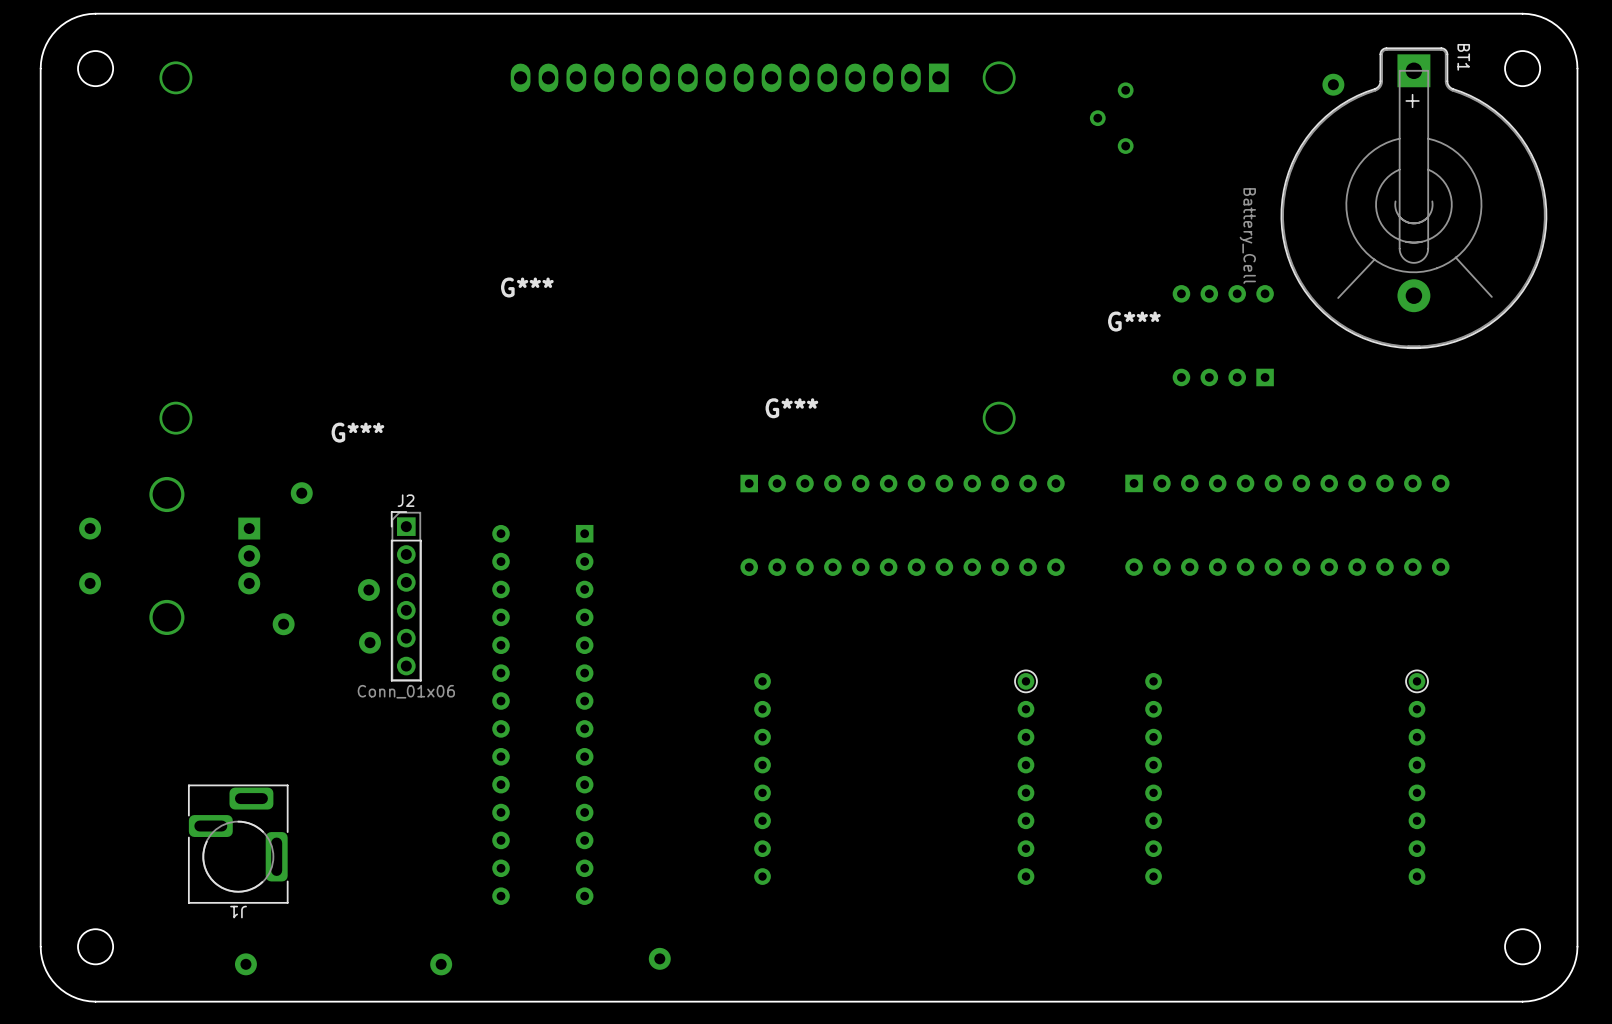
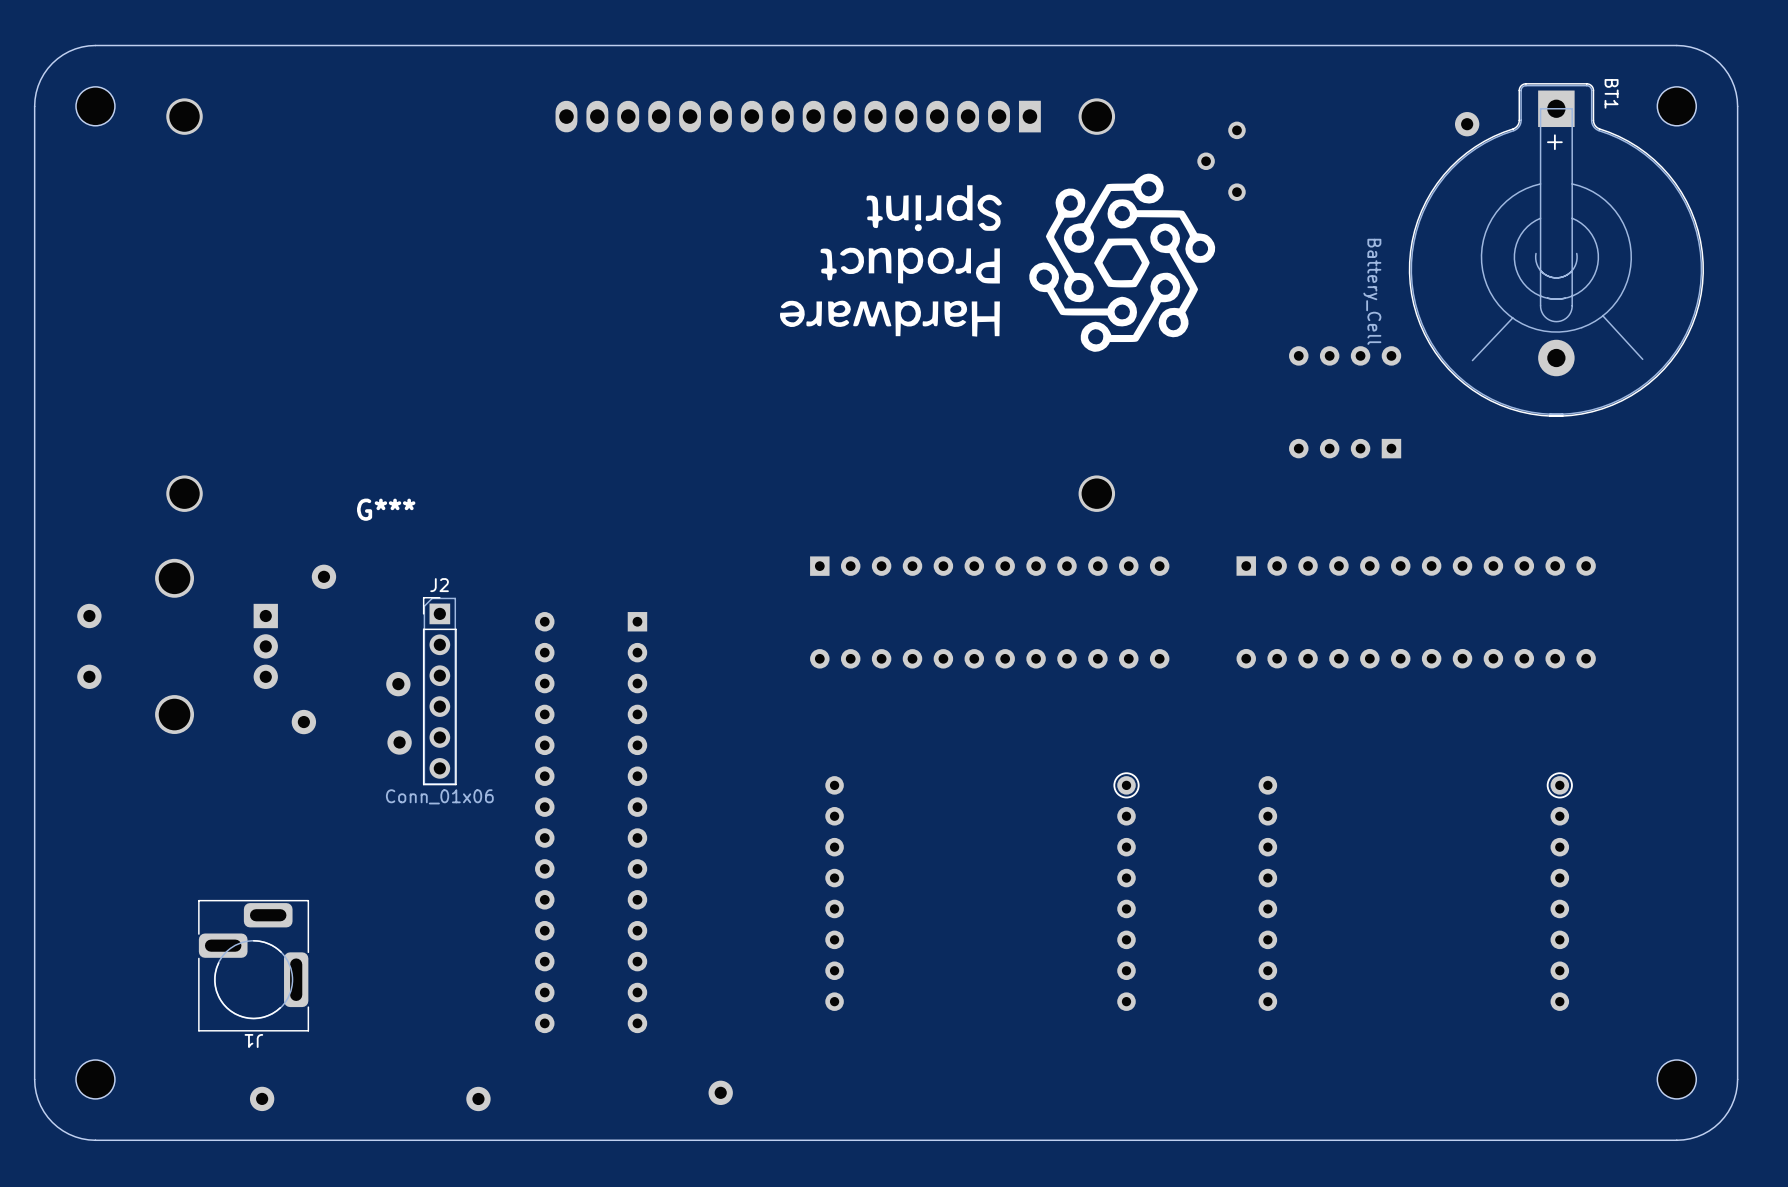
drawing: none -> [779, 173, 1216, 352]
G***: (527, 287) -> none
G***: (1134, 321) -> none
G***: (791, 408) -> none

